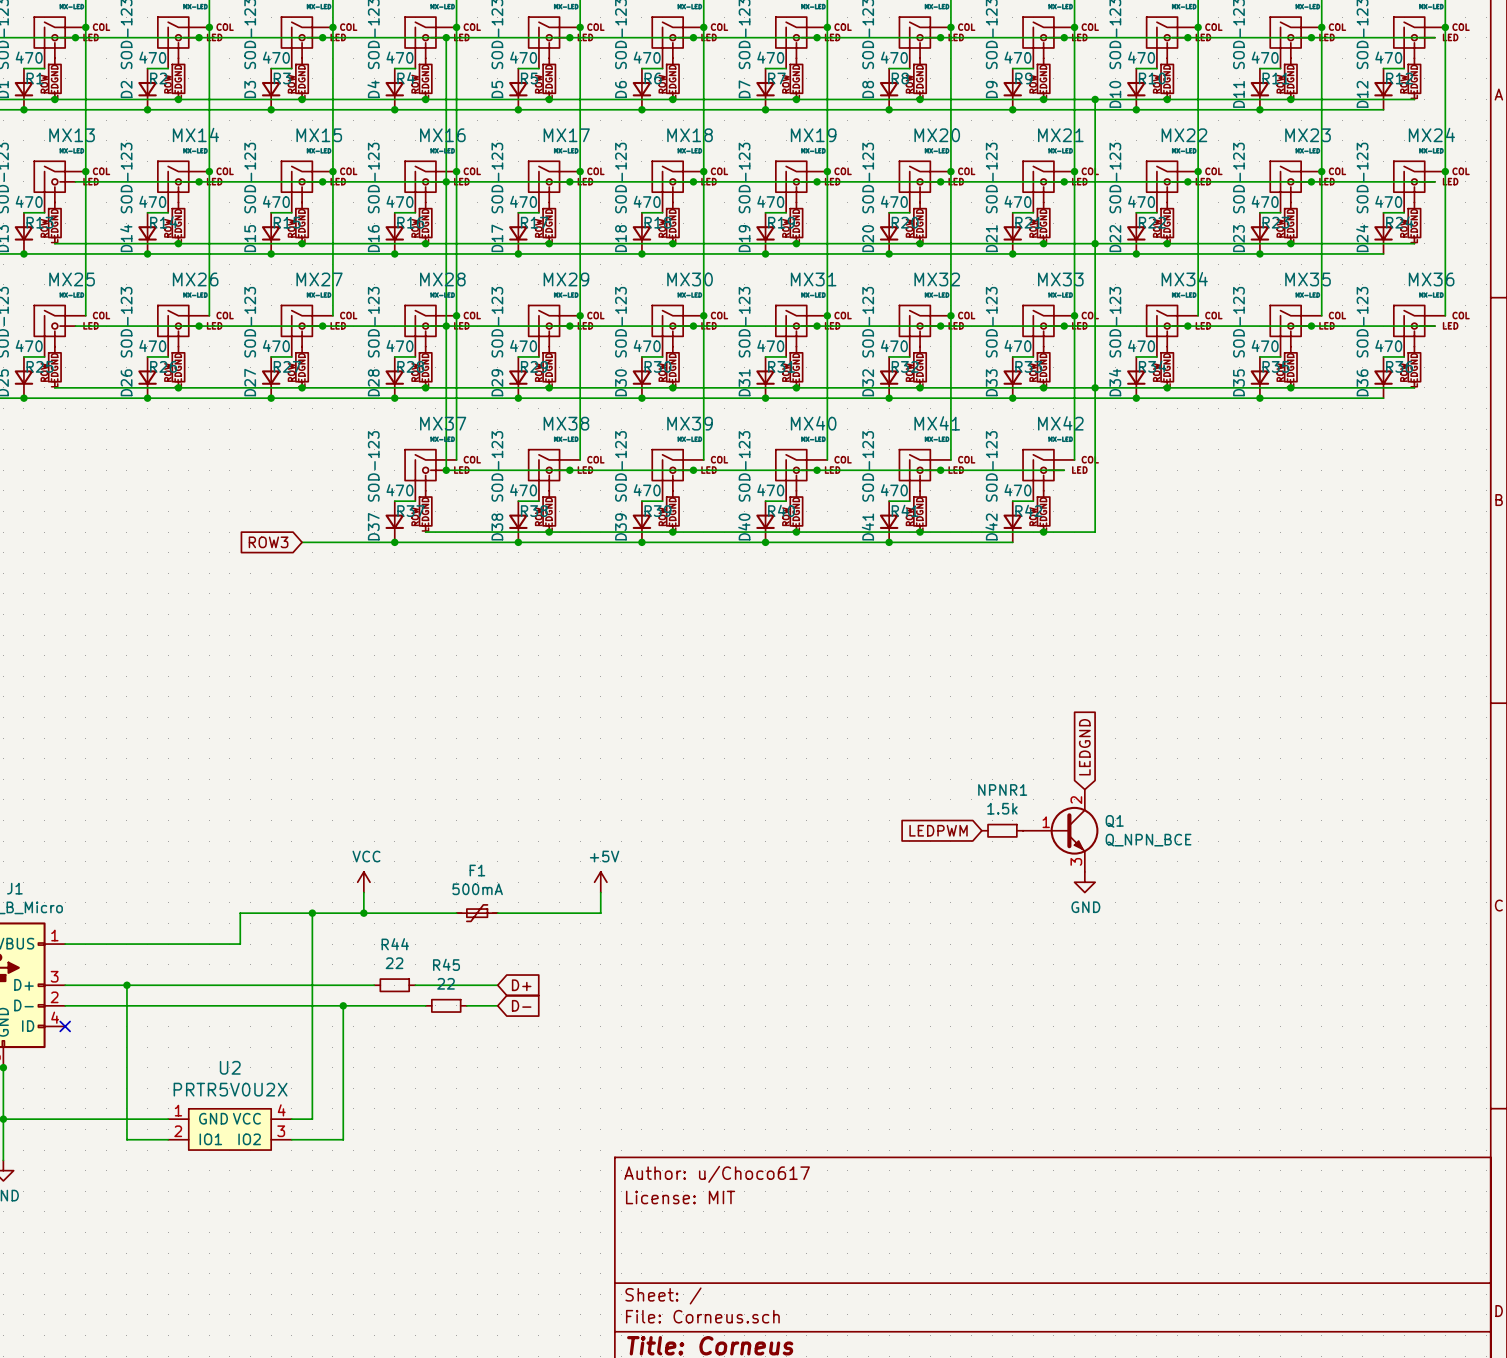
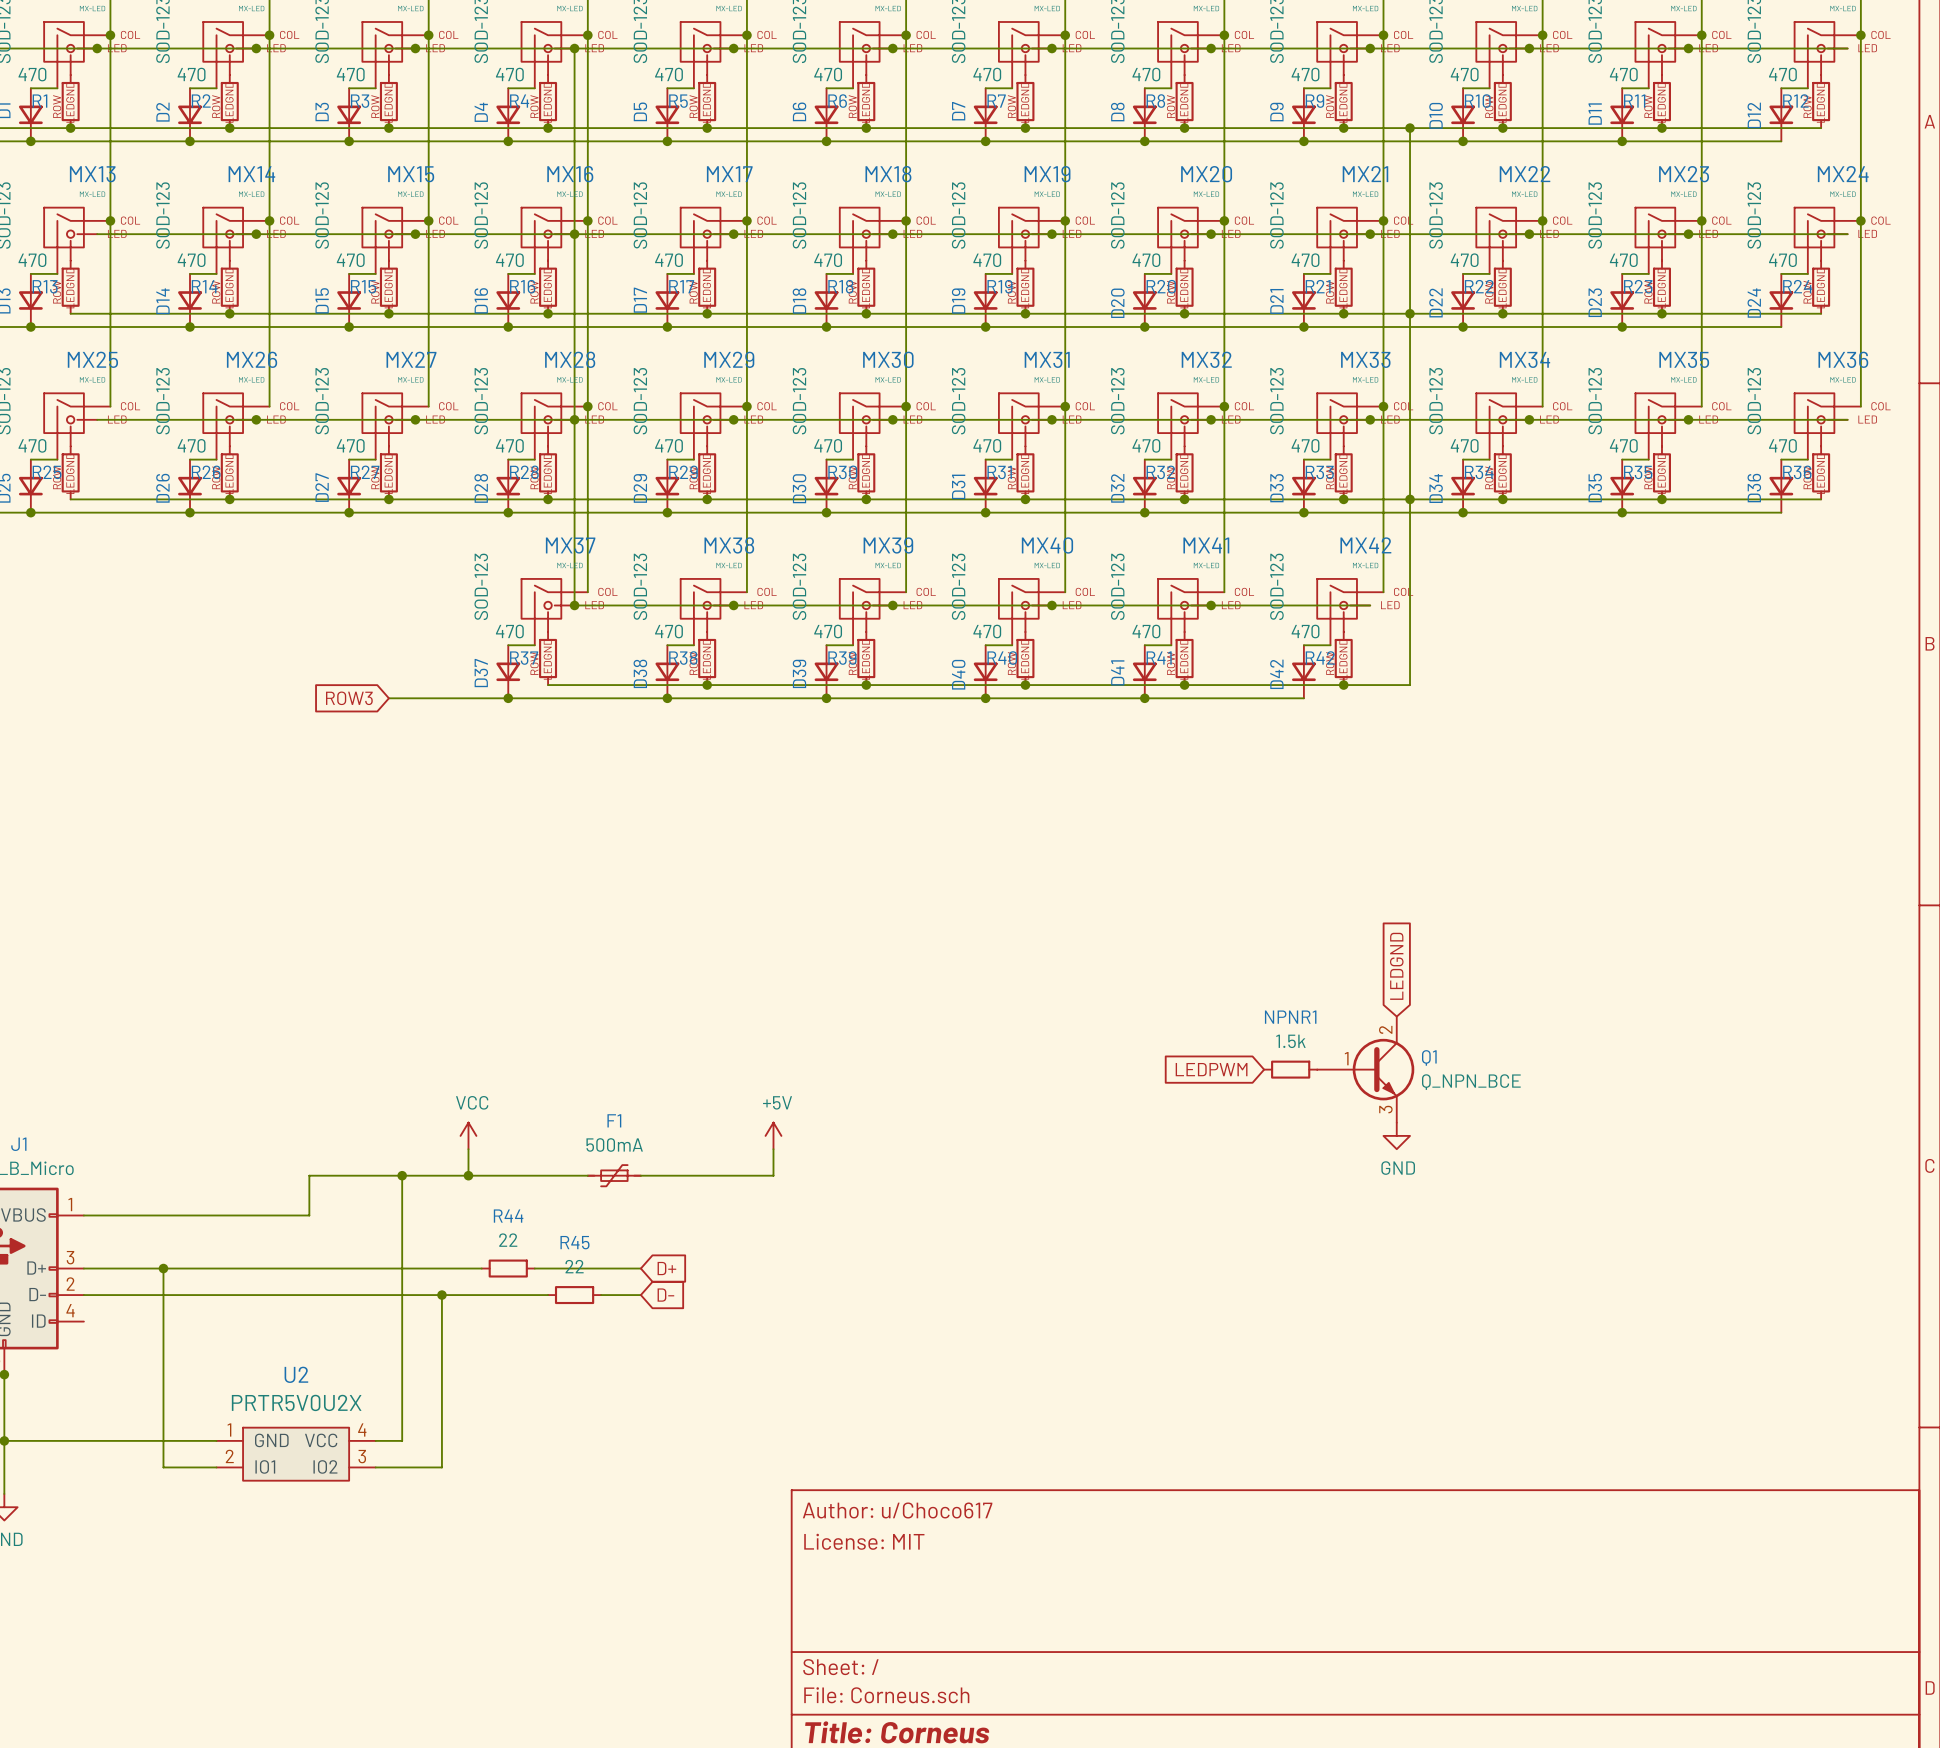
no-connect mark: (65, 1026) -> none

